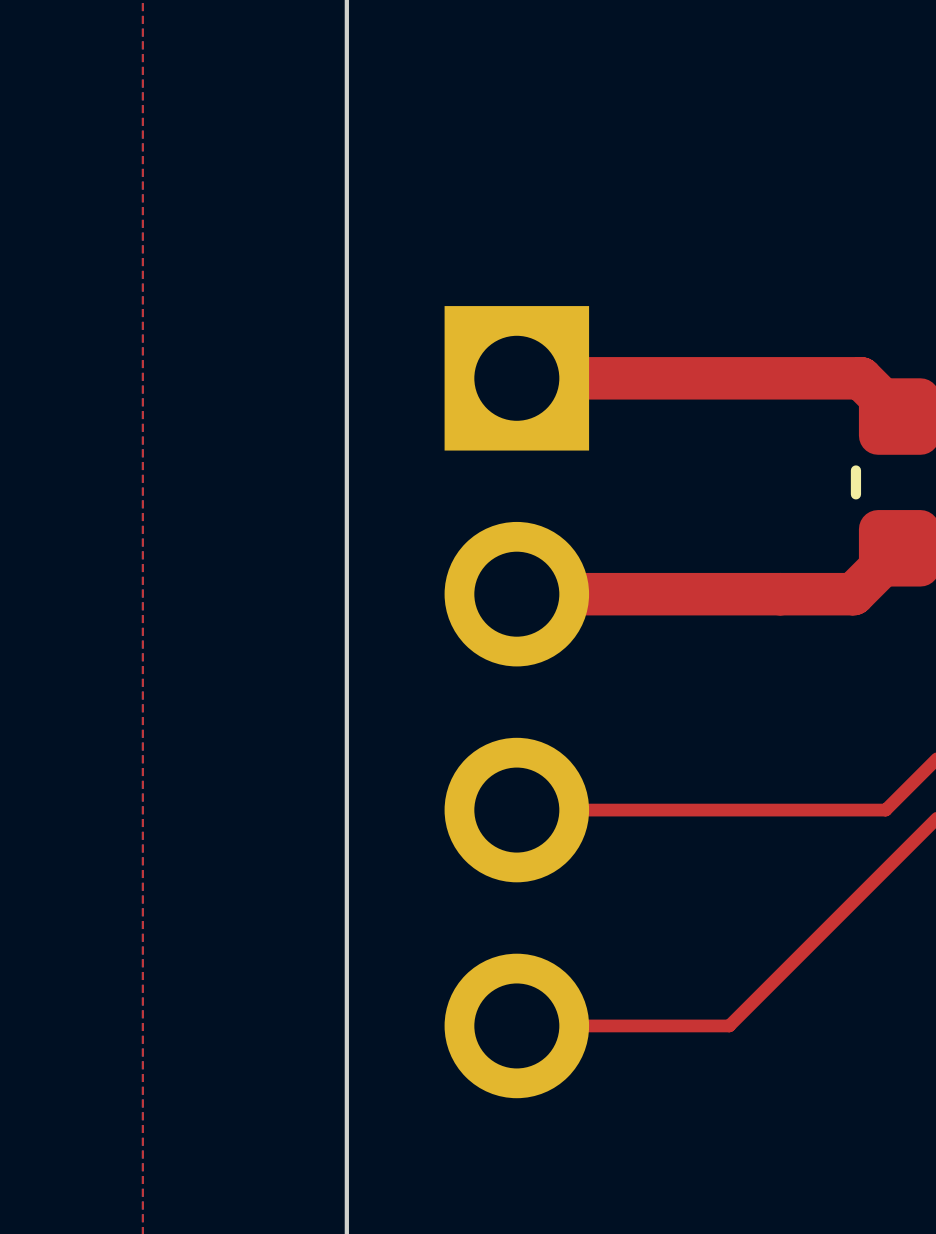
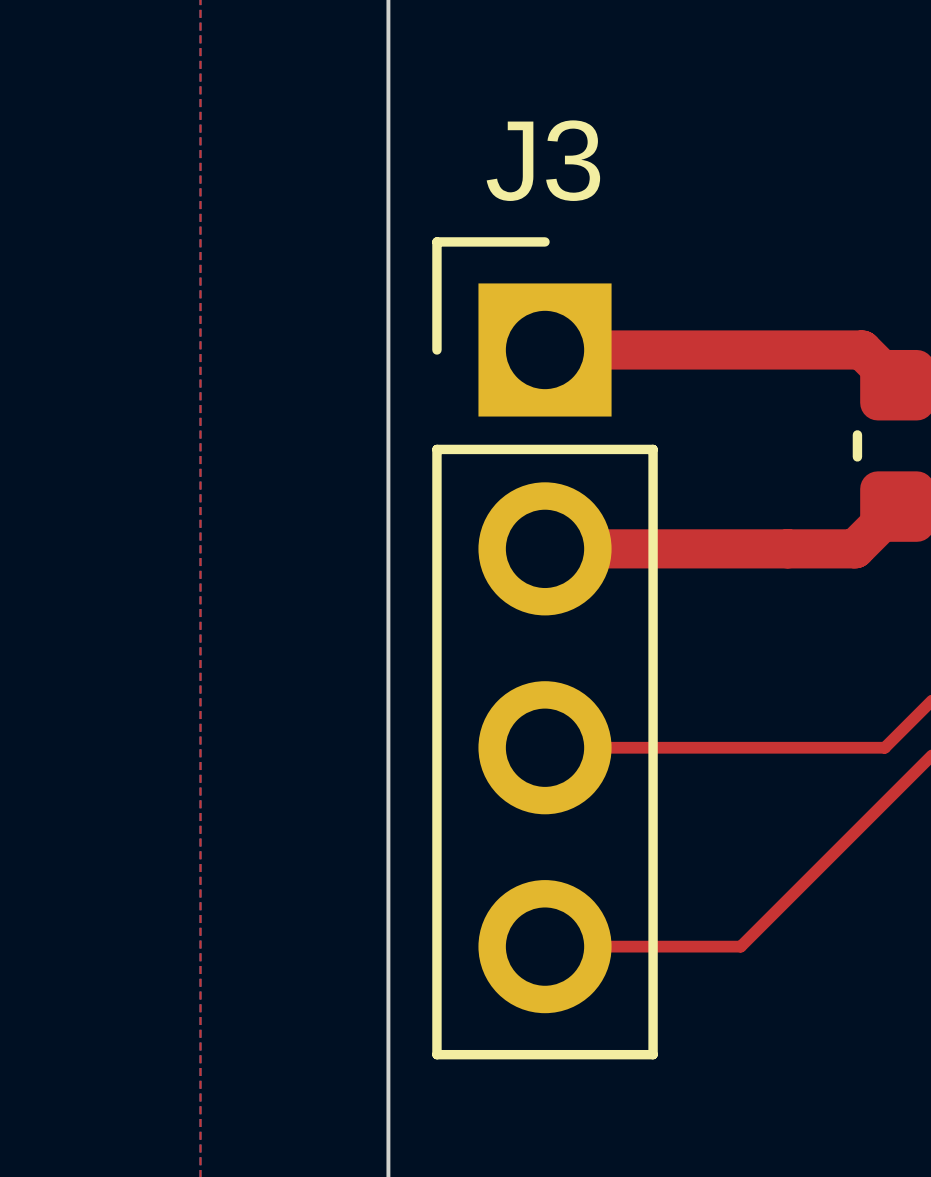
J3 side: bottom (516, 702) -> top (545, 648)

